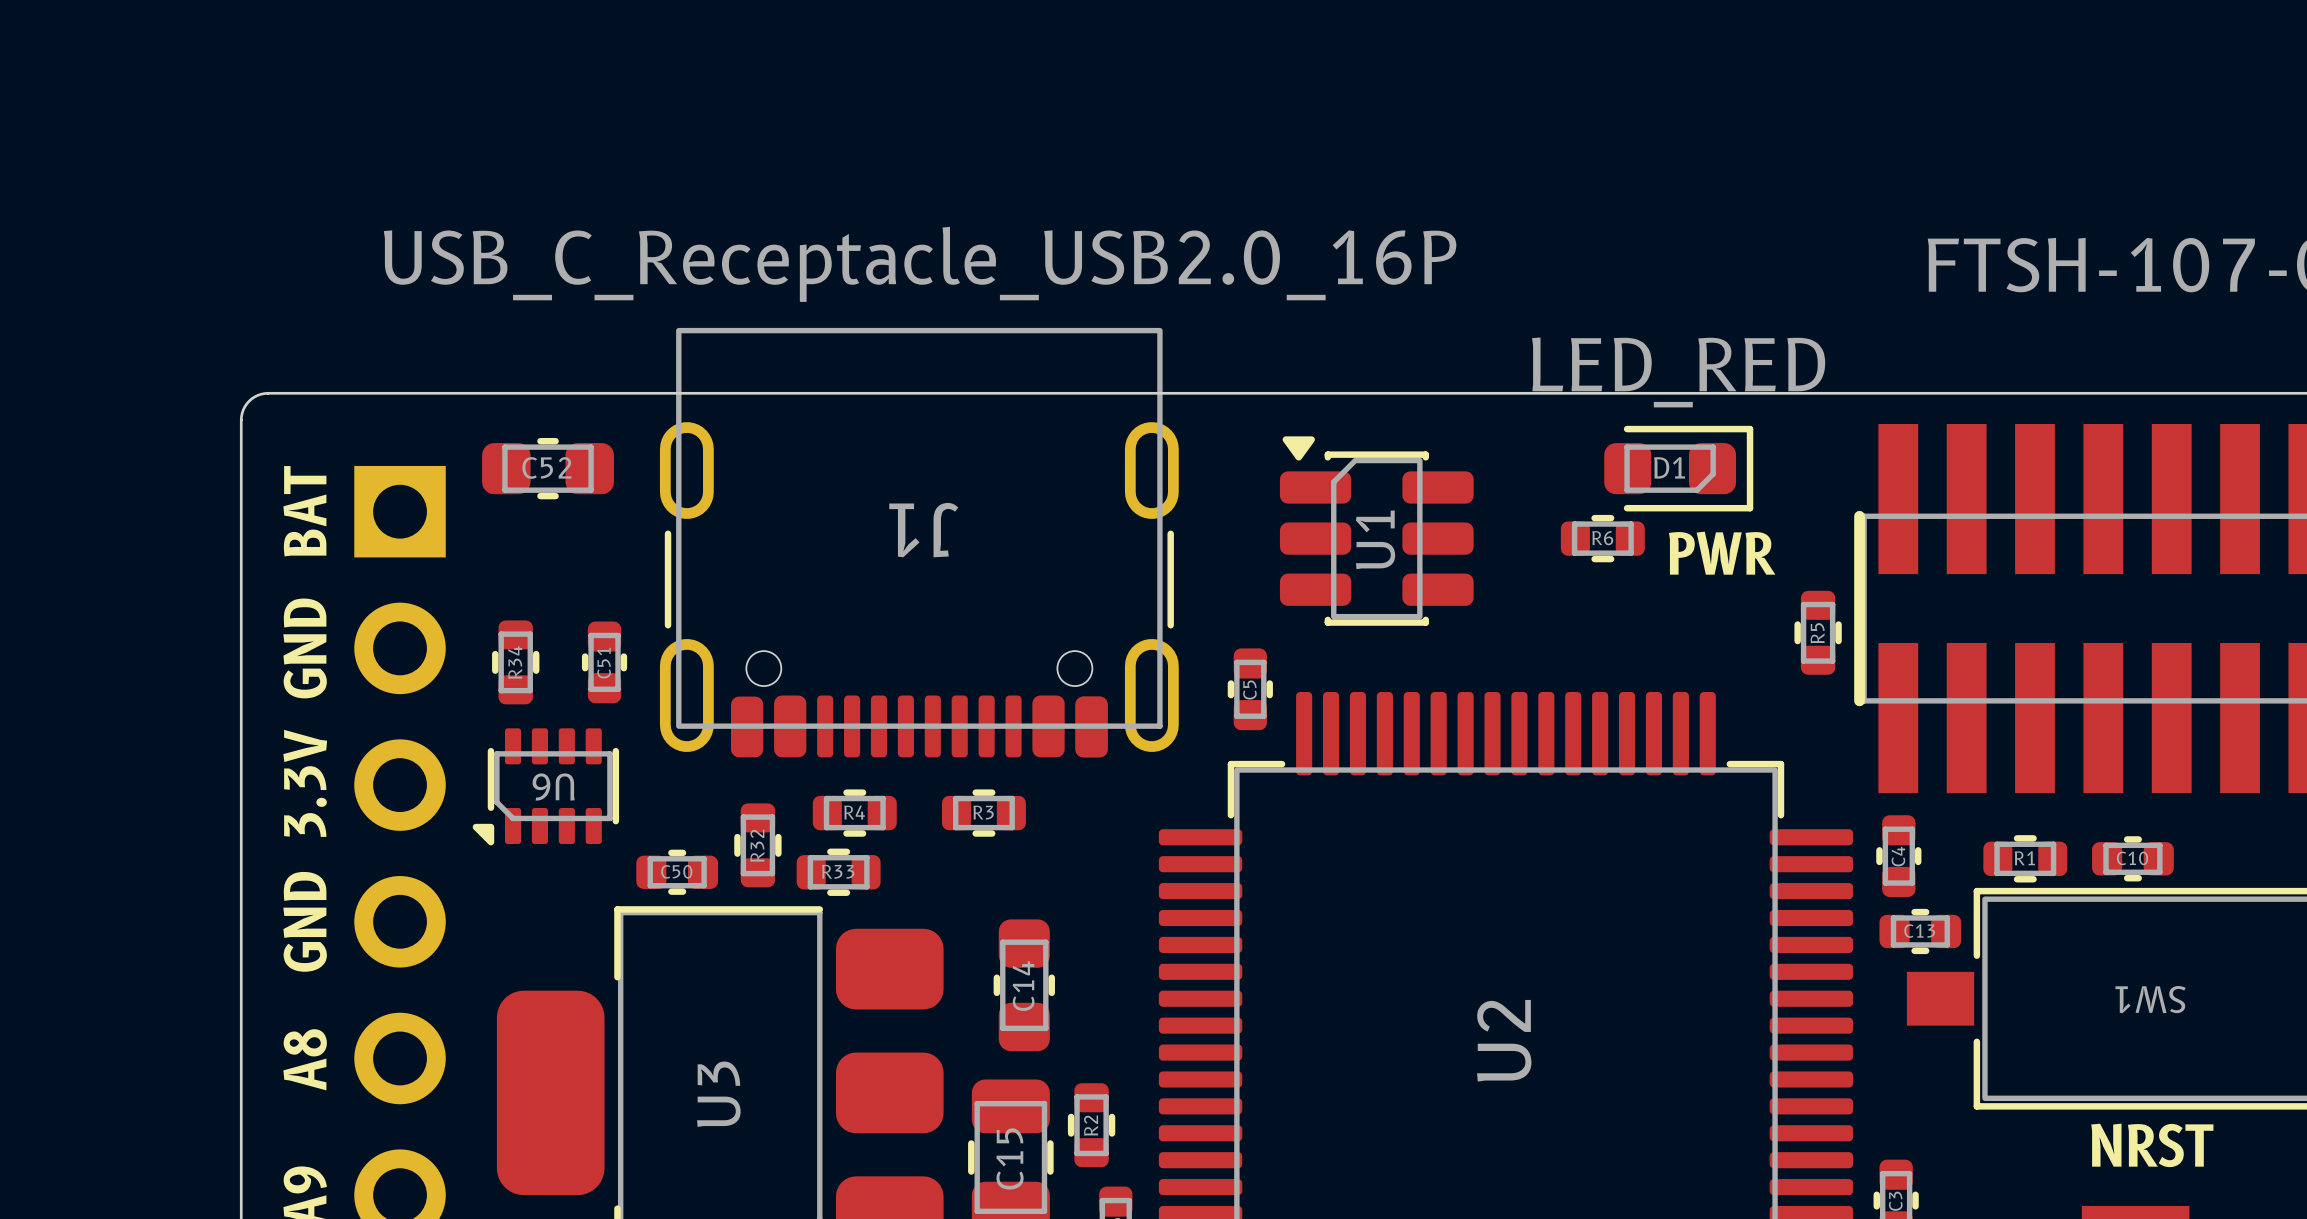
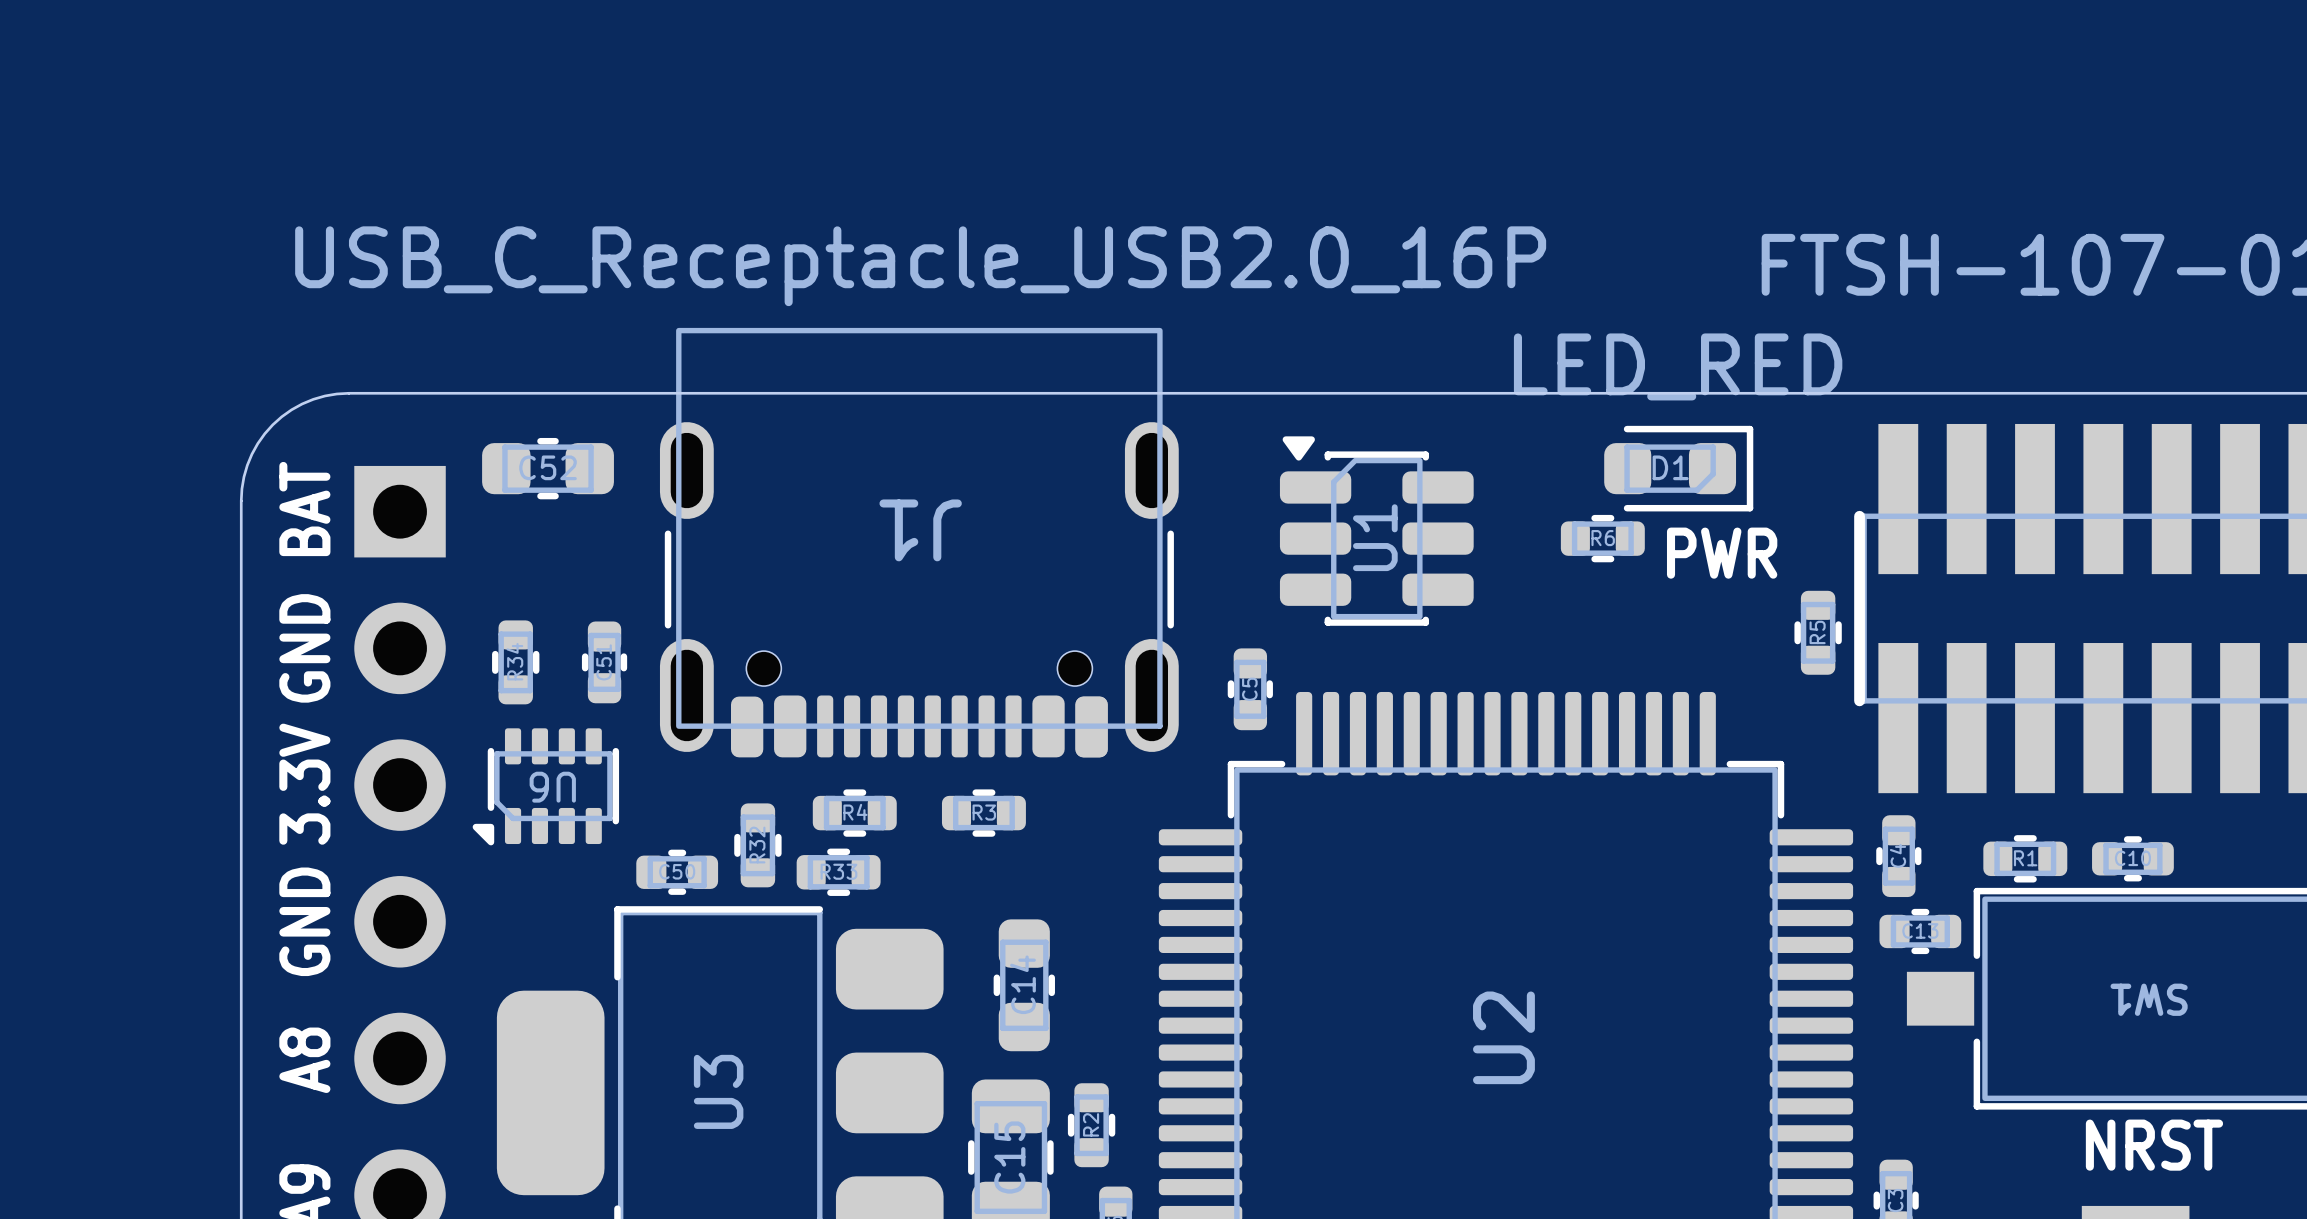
board edge: (348, 393) (264, 393) (249, 401) (241, 416) (241, 500) -> (348, 393) (313, 399) (291, 409) (272, 424) (257, 443) (247, 465) (241, 500)

